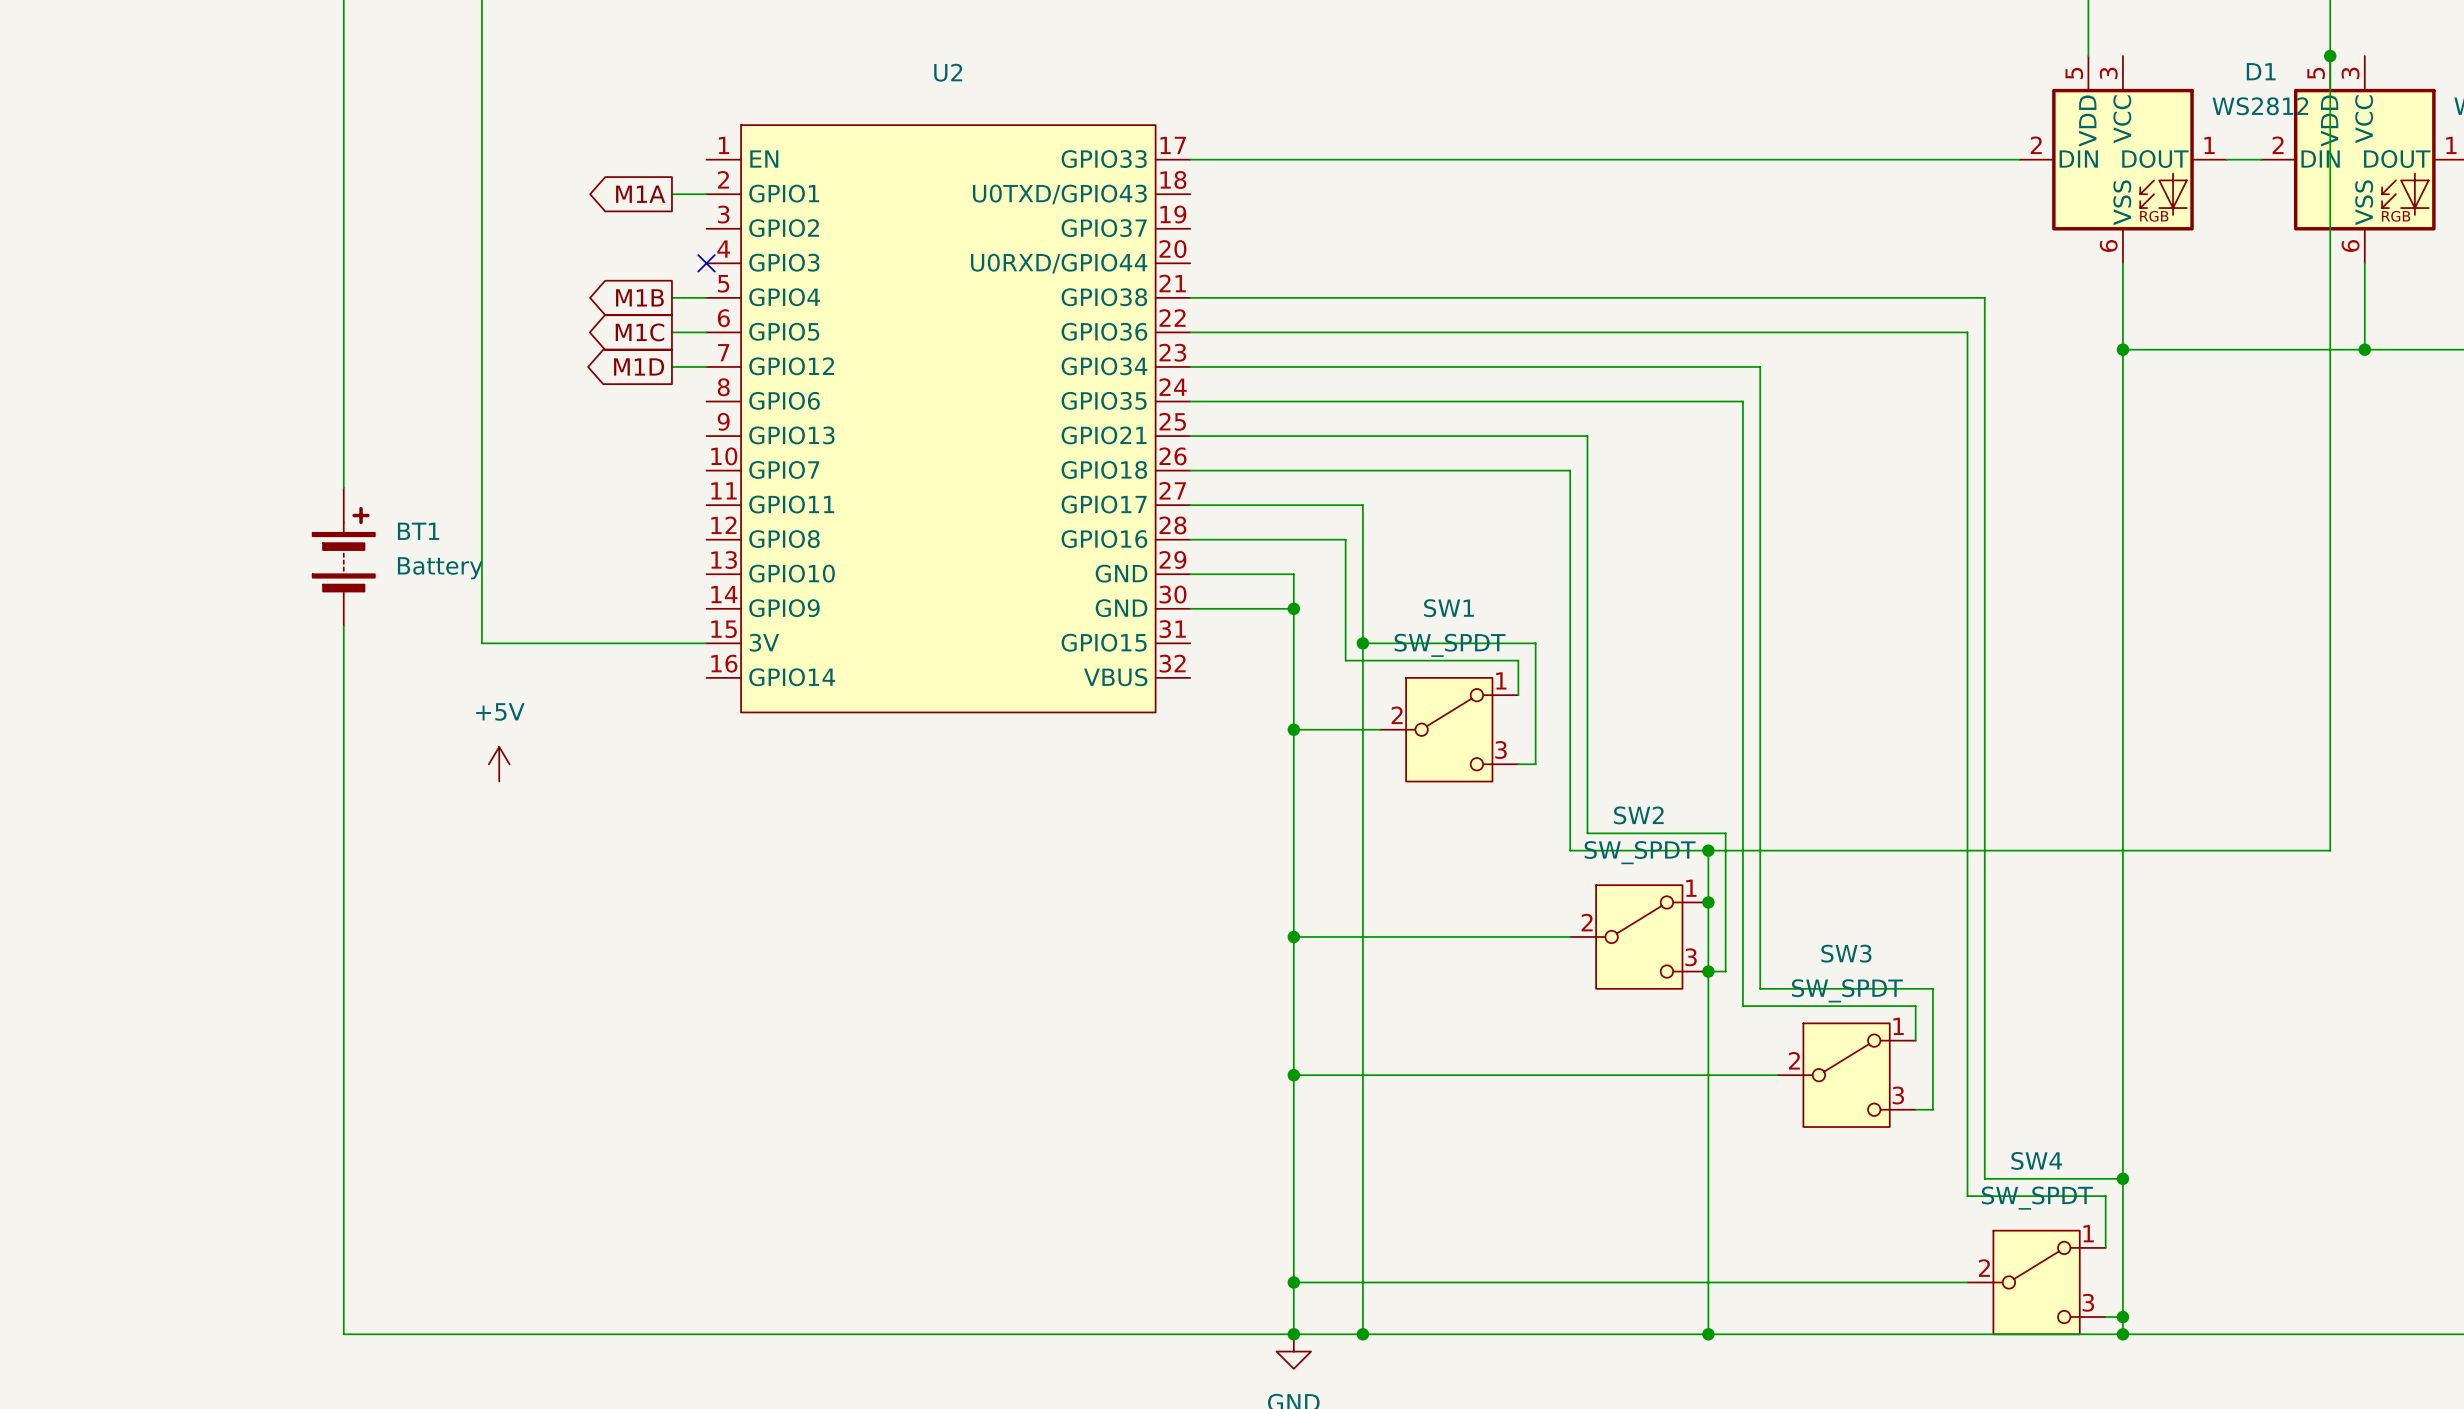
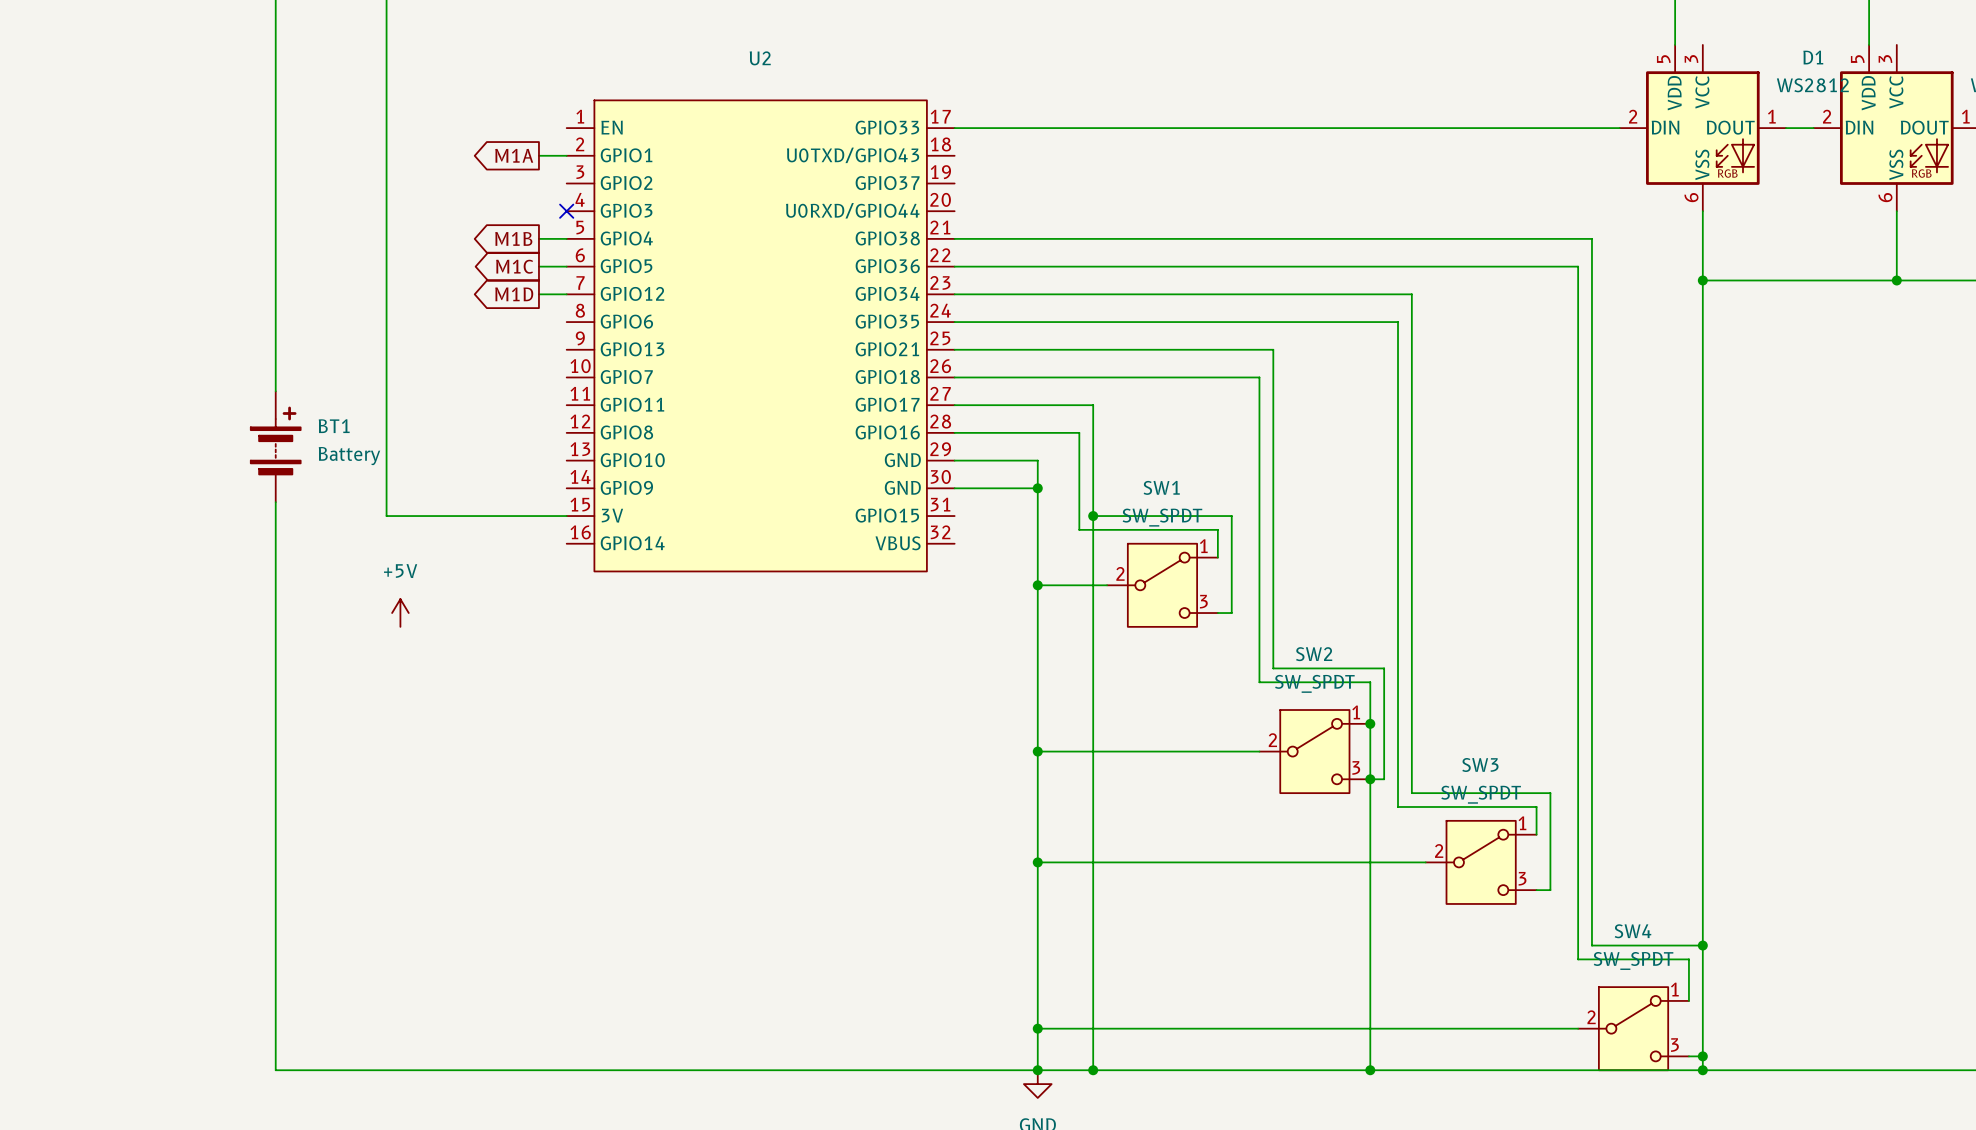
wire: (2330, 56) (2330, 850) (1708, 850) -> none
junction: (2330, 56) -> none
junction: (1708, 850) -> none

